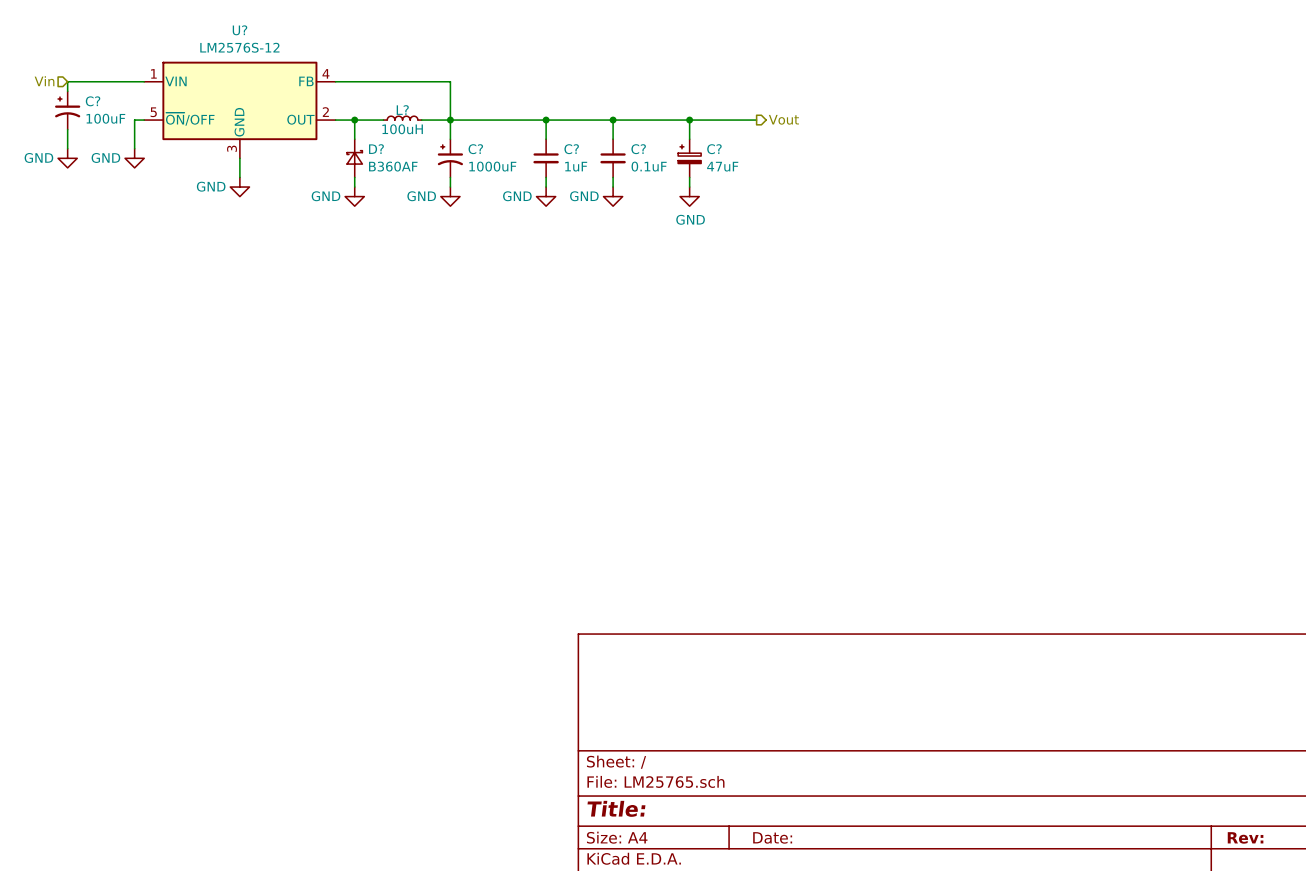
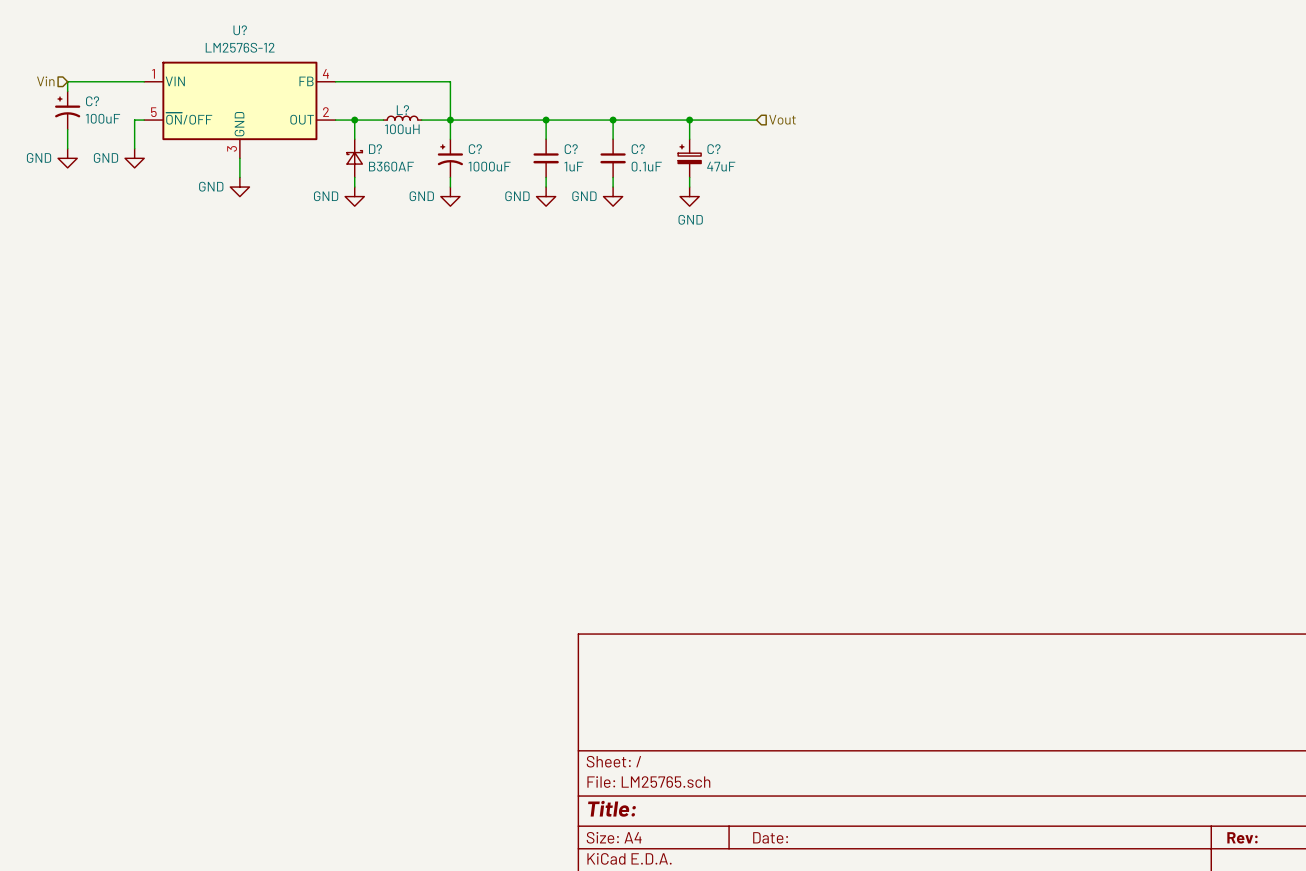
hierarchical label shape: output (783, 119) -> input (782, 119)

